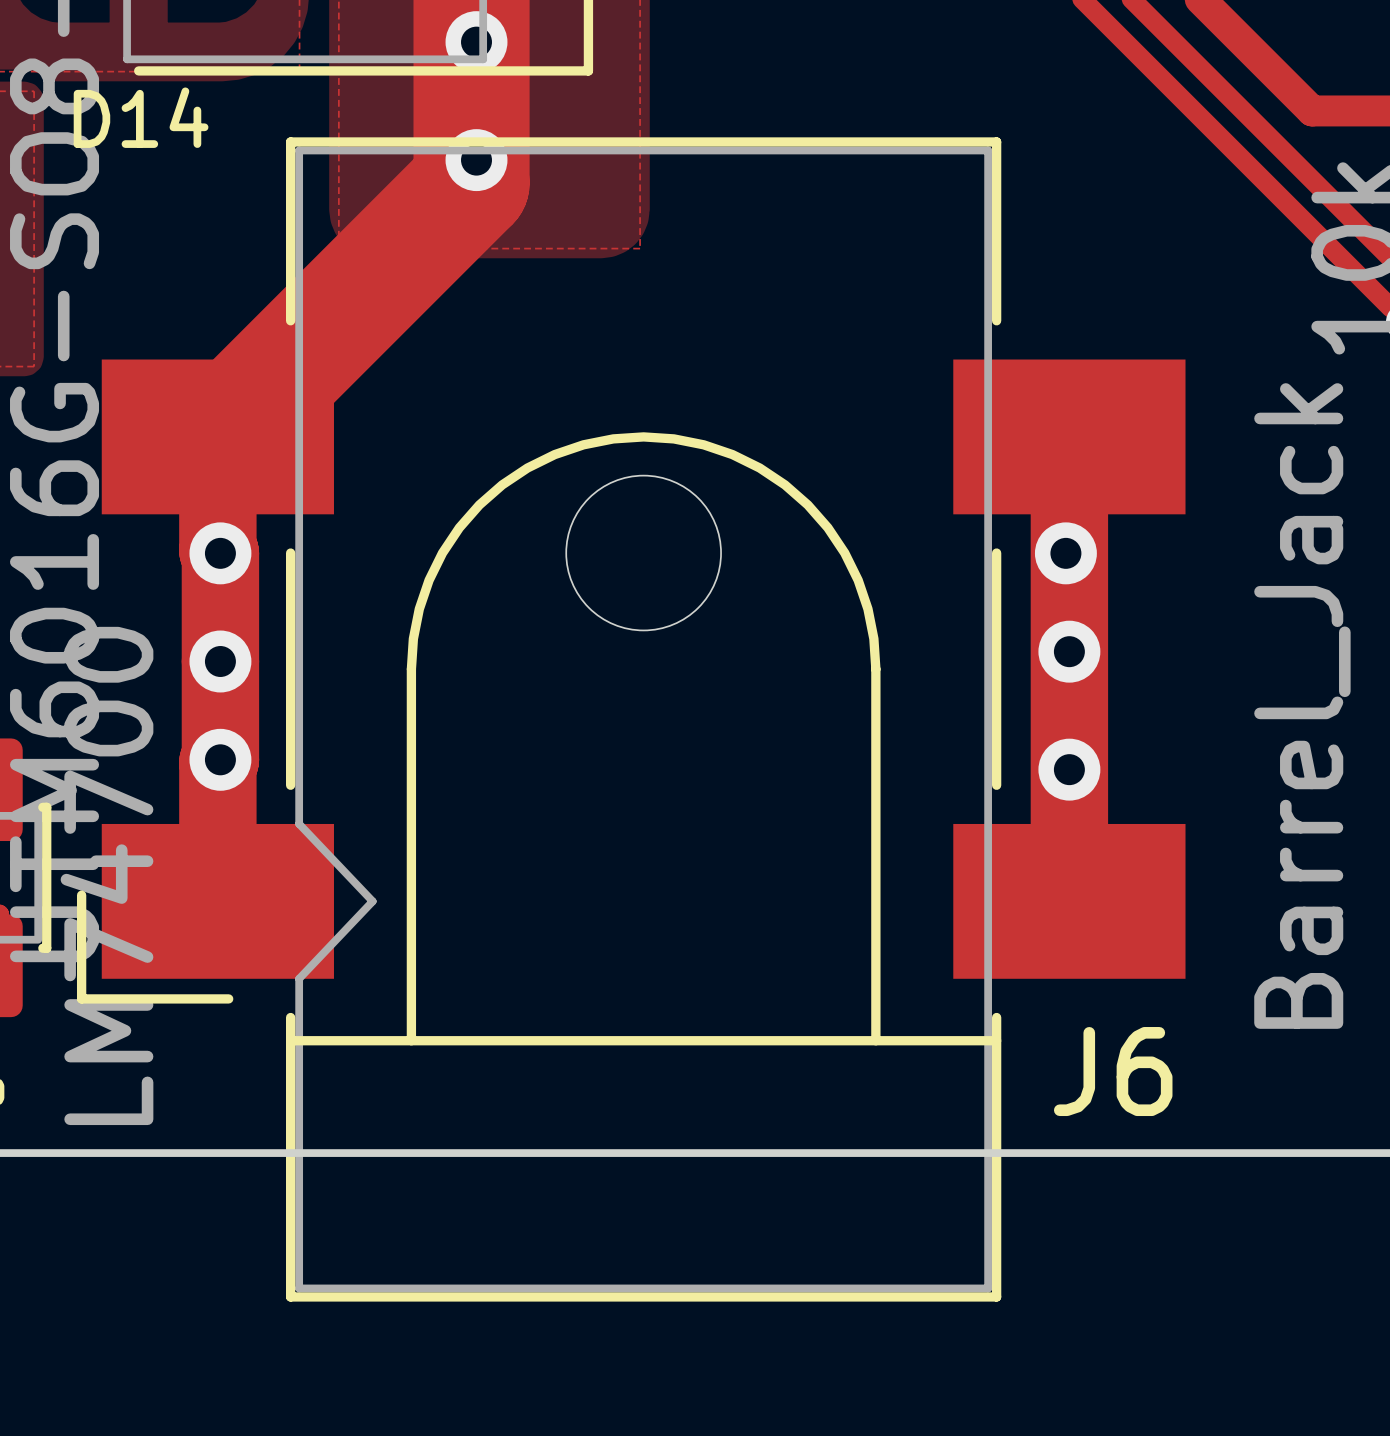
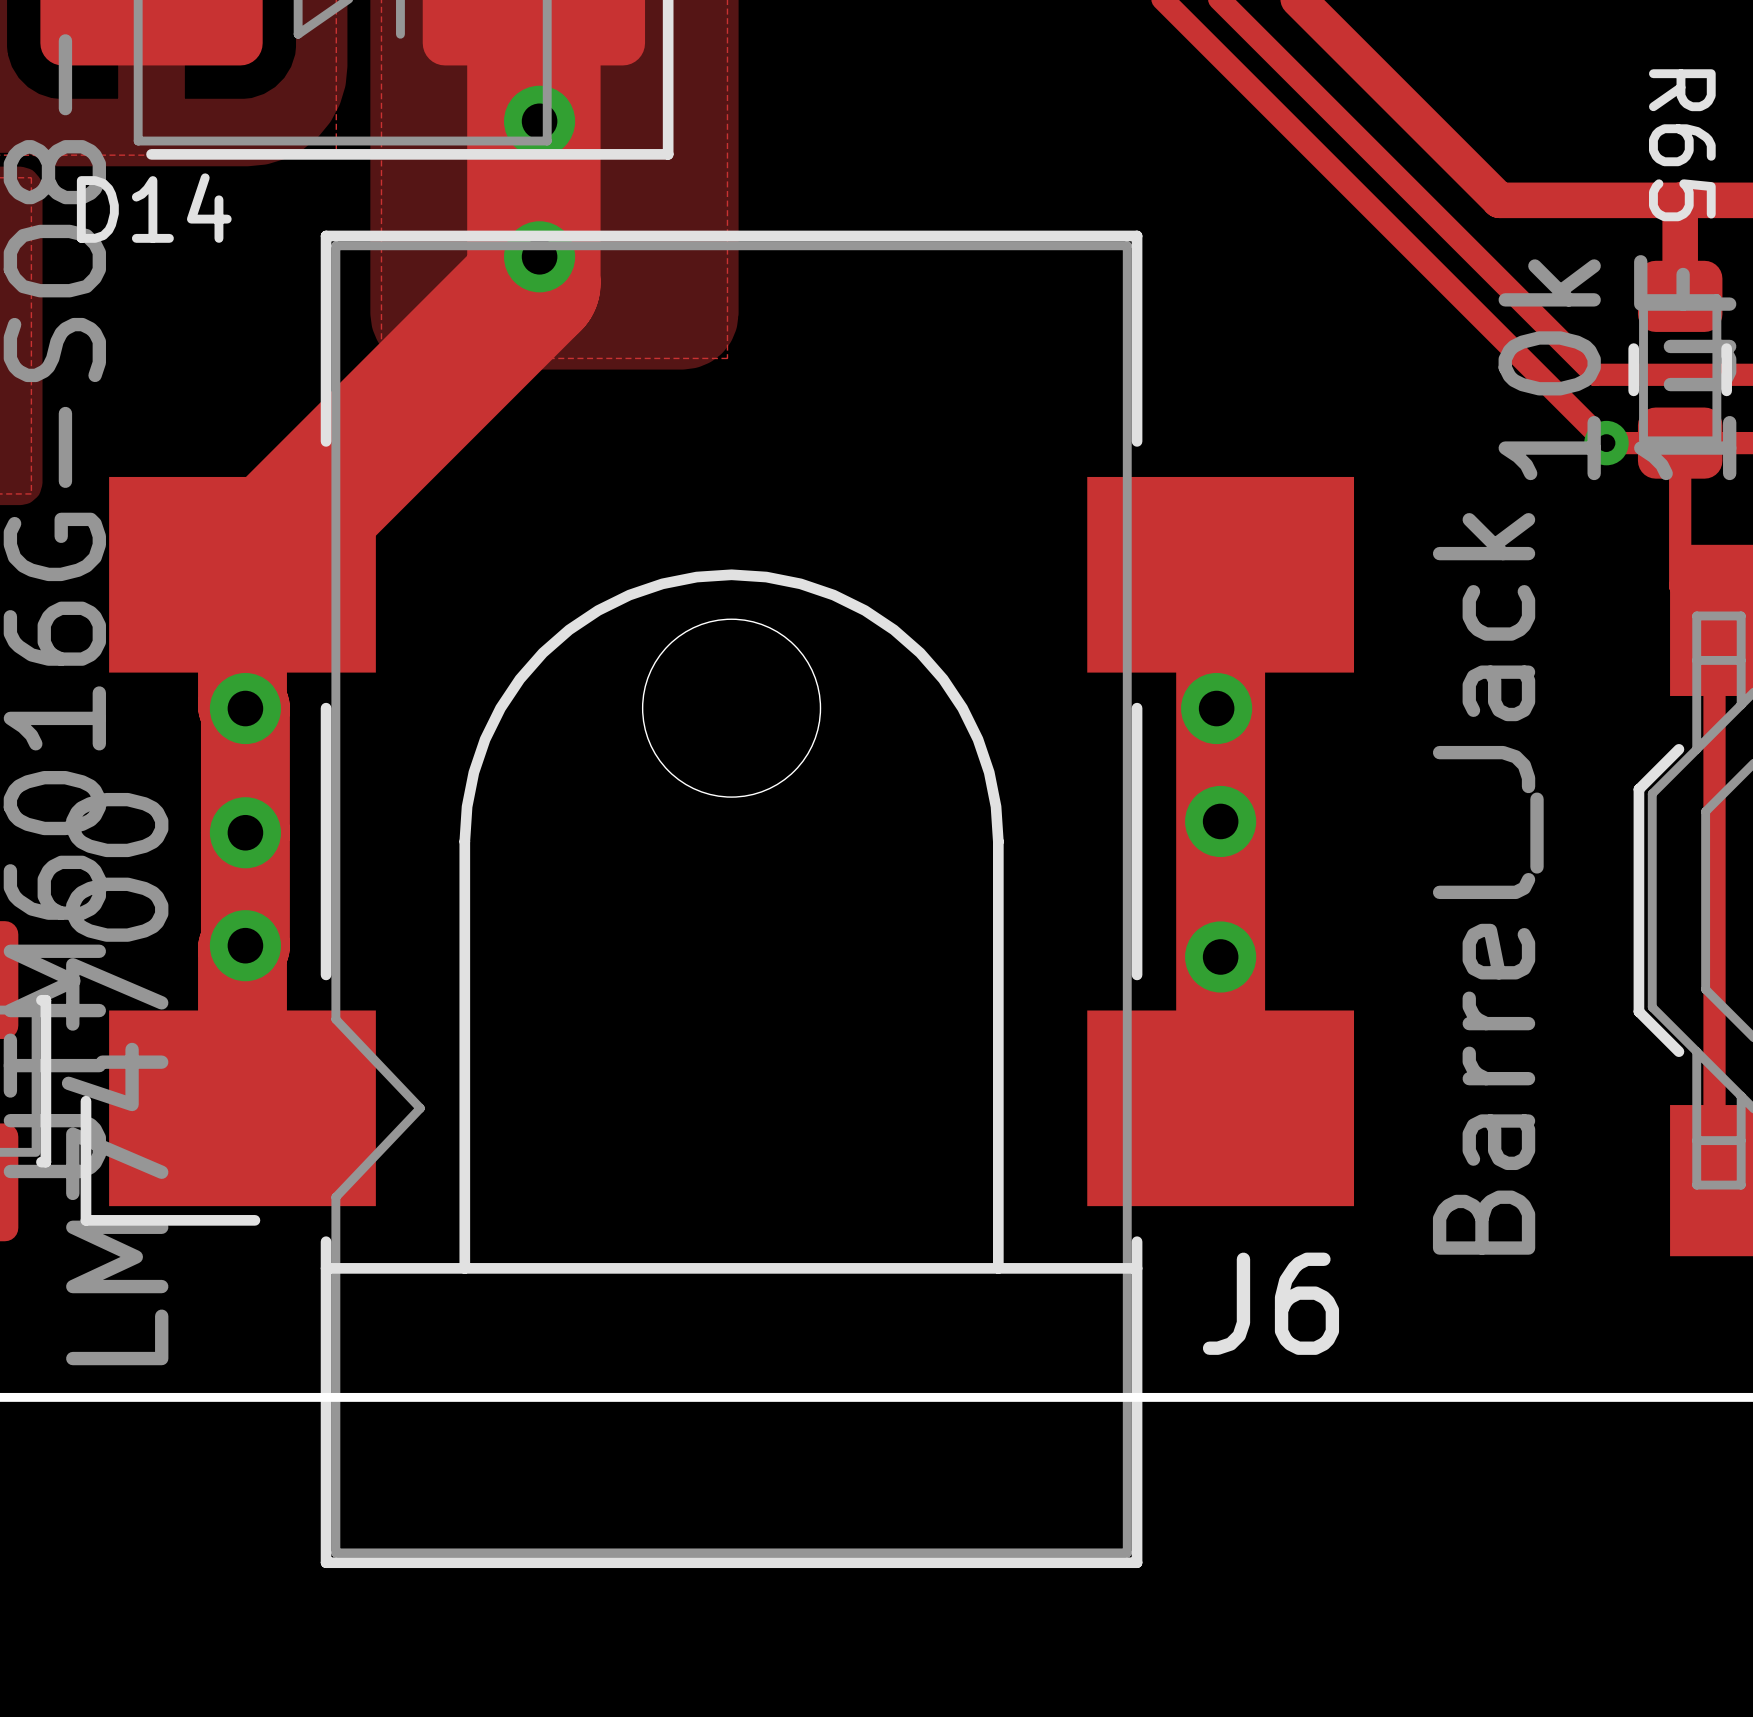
J6 footprint: [76, 137, 1186, 1302] -> [80, 230, 1355, 1569]

